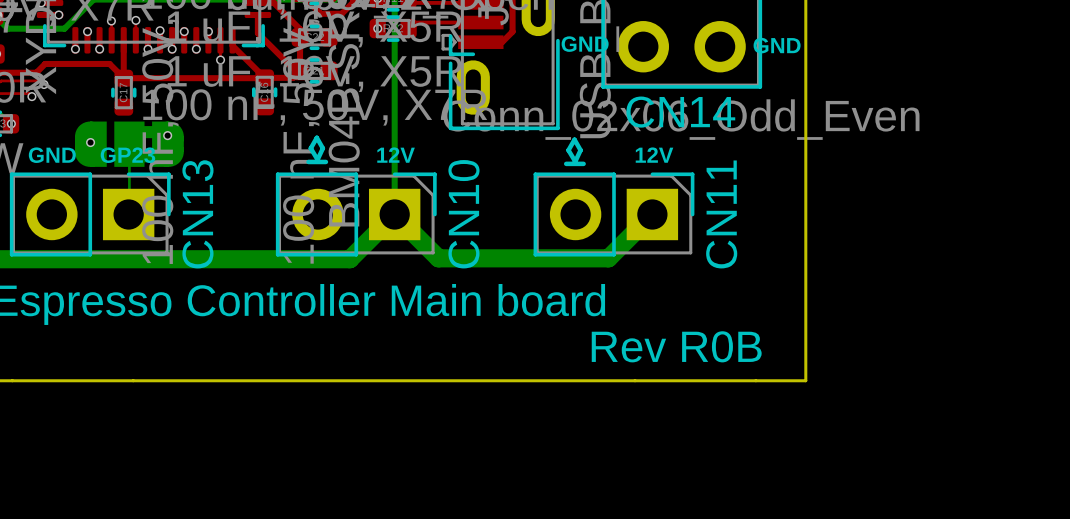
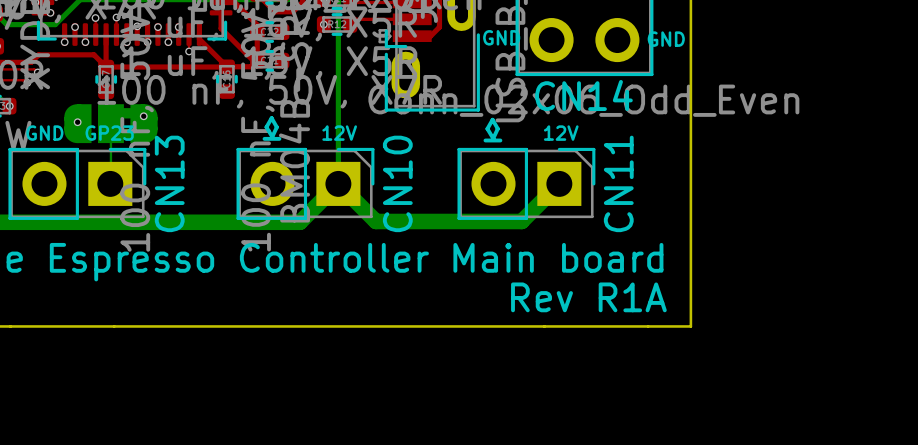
text: Rev R0B (676, 346) -> Rev R1A (588, 297)

